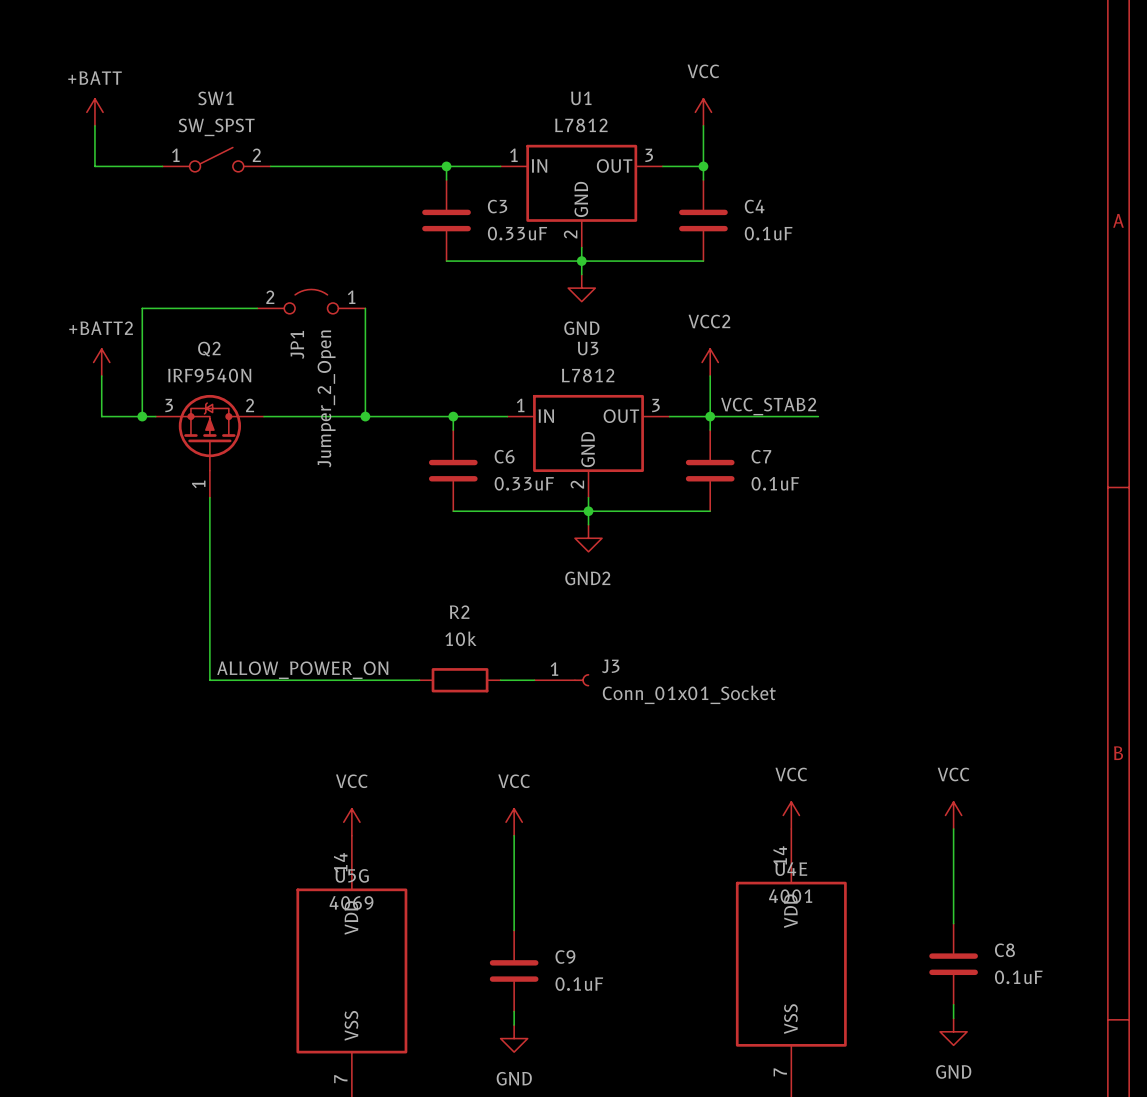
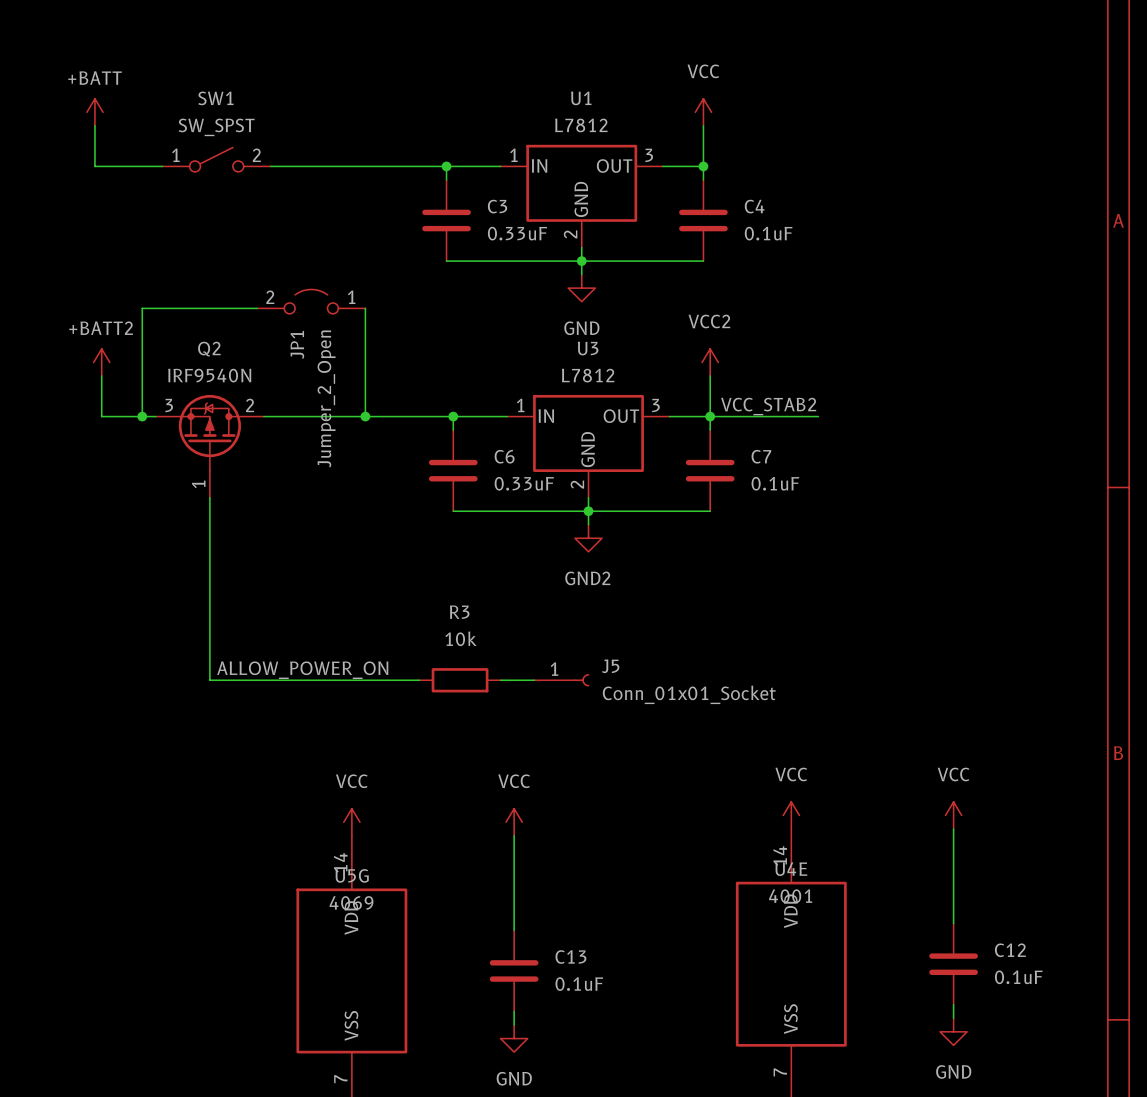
R2 name: R2 (459, 612) -> R3 (459, 612)
J3 name: J3 (610, 666) -> J5 (610, 666)
C8 name: C8 (1004, 950) -> C12 (1010, 950)
C9 name: C9 (565, 957) -> C13 (570, 957)

